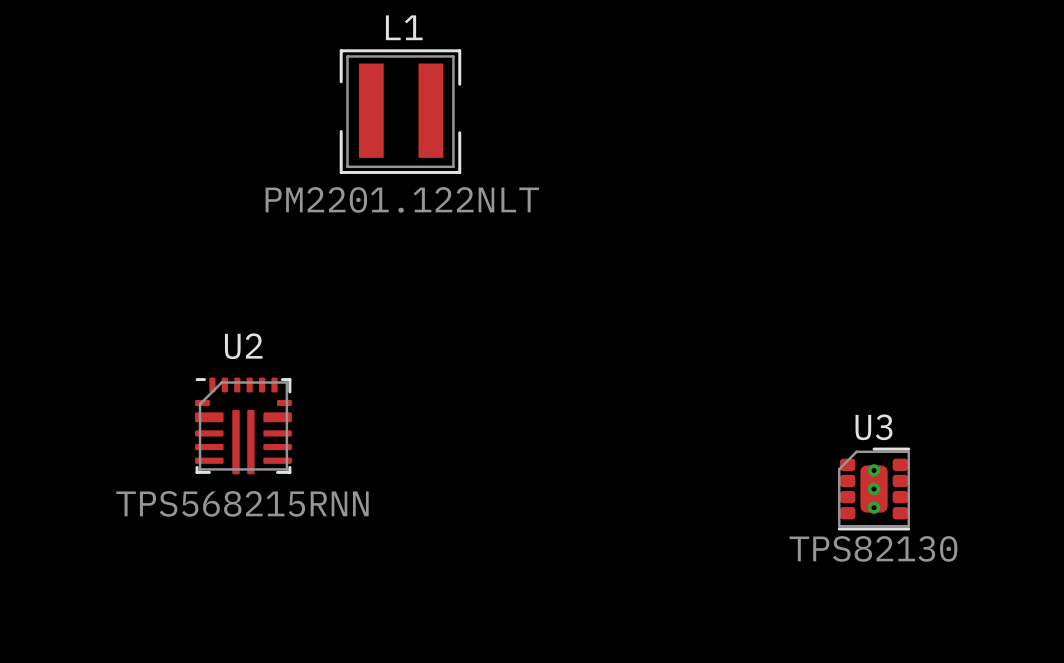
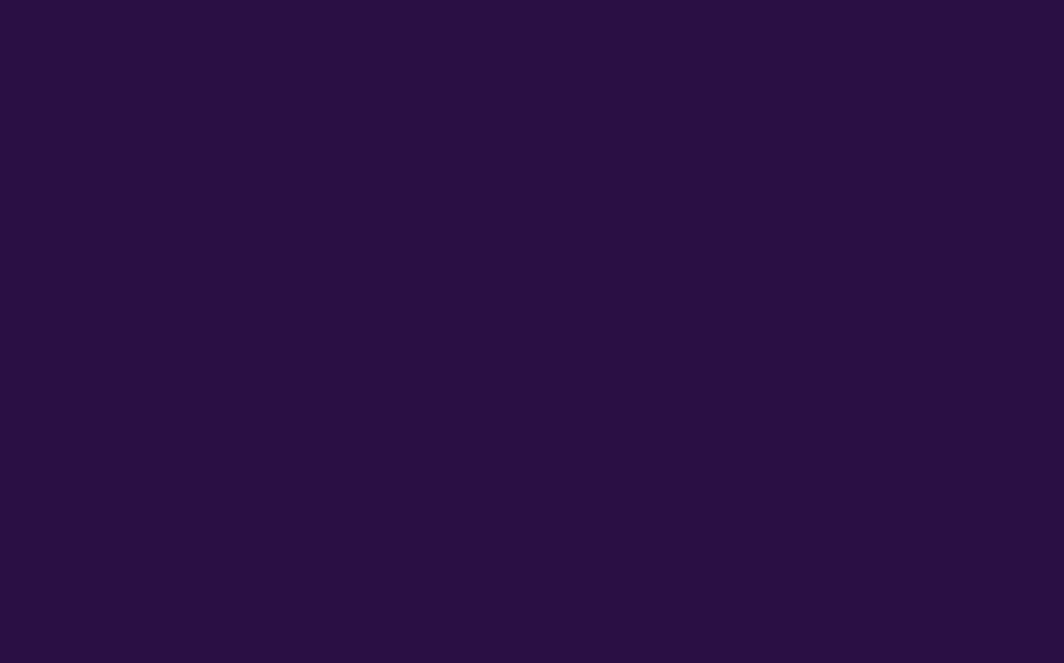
L1: PM2201.122NLT (400, 111) -> none
U2: TPS568215RNN (243, 425) -> none
U3: TPS82130 (874, 489) -> none

